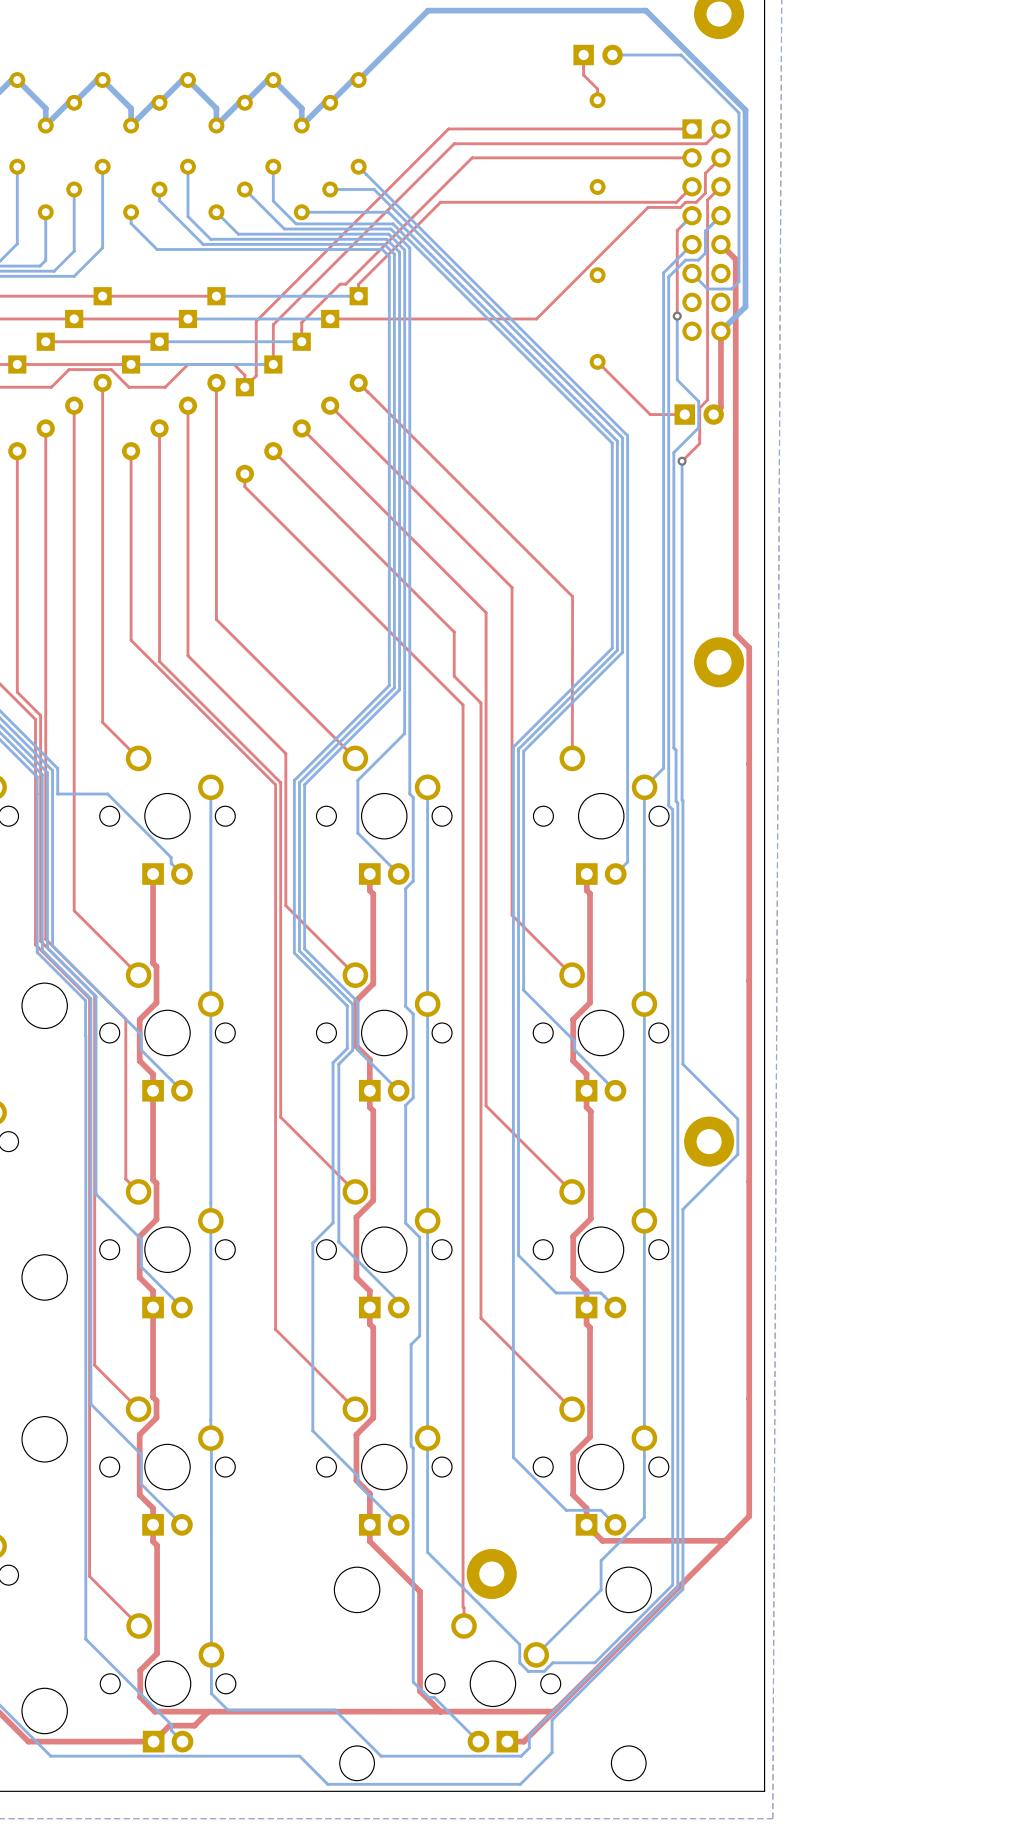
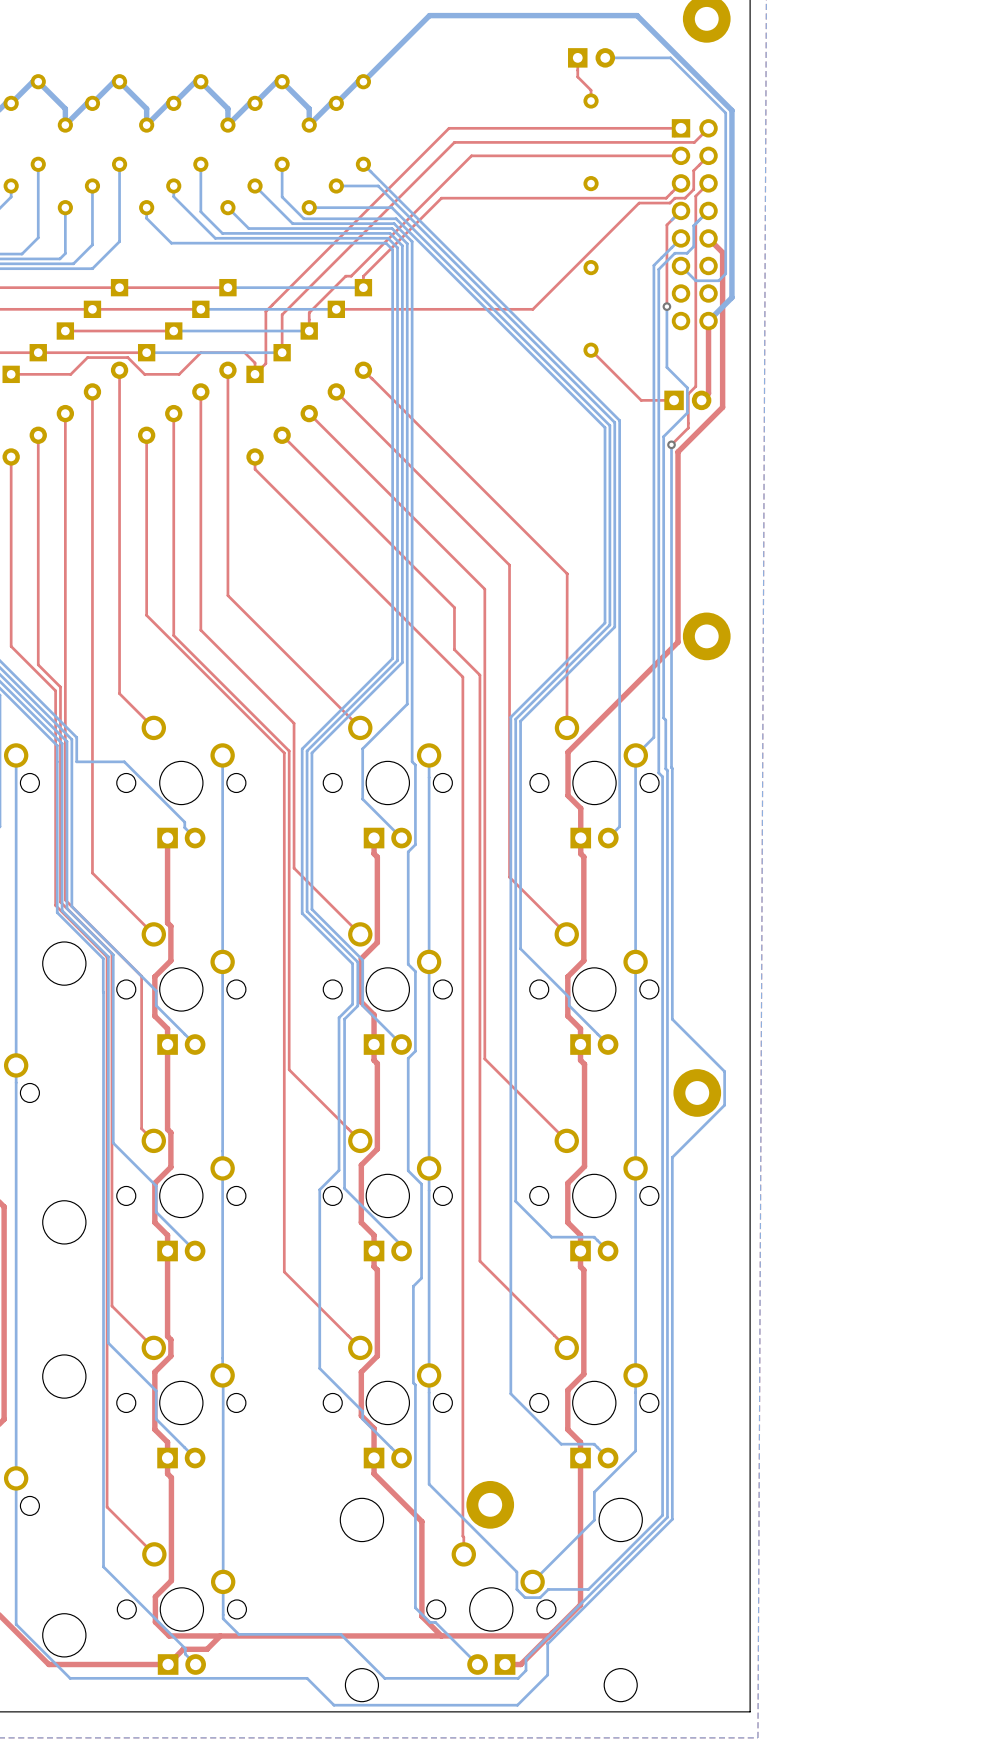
top track: (735, 421) (735, 634) (749, 647) (749, 1516) (725, 1541) -> (722, 407) (678, 451) (678, 642) (568, 752) (568, 795) (580, 808) (580, 838)
top track: (586, 1524) (602, 1540) (725, 1541) -> none
top track: (725, 1541) (557, 1708) -> (580, 1458) (580, 1604) (552, 1632)

